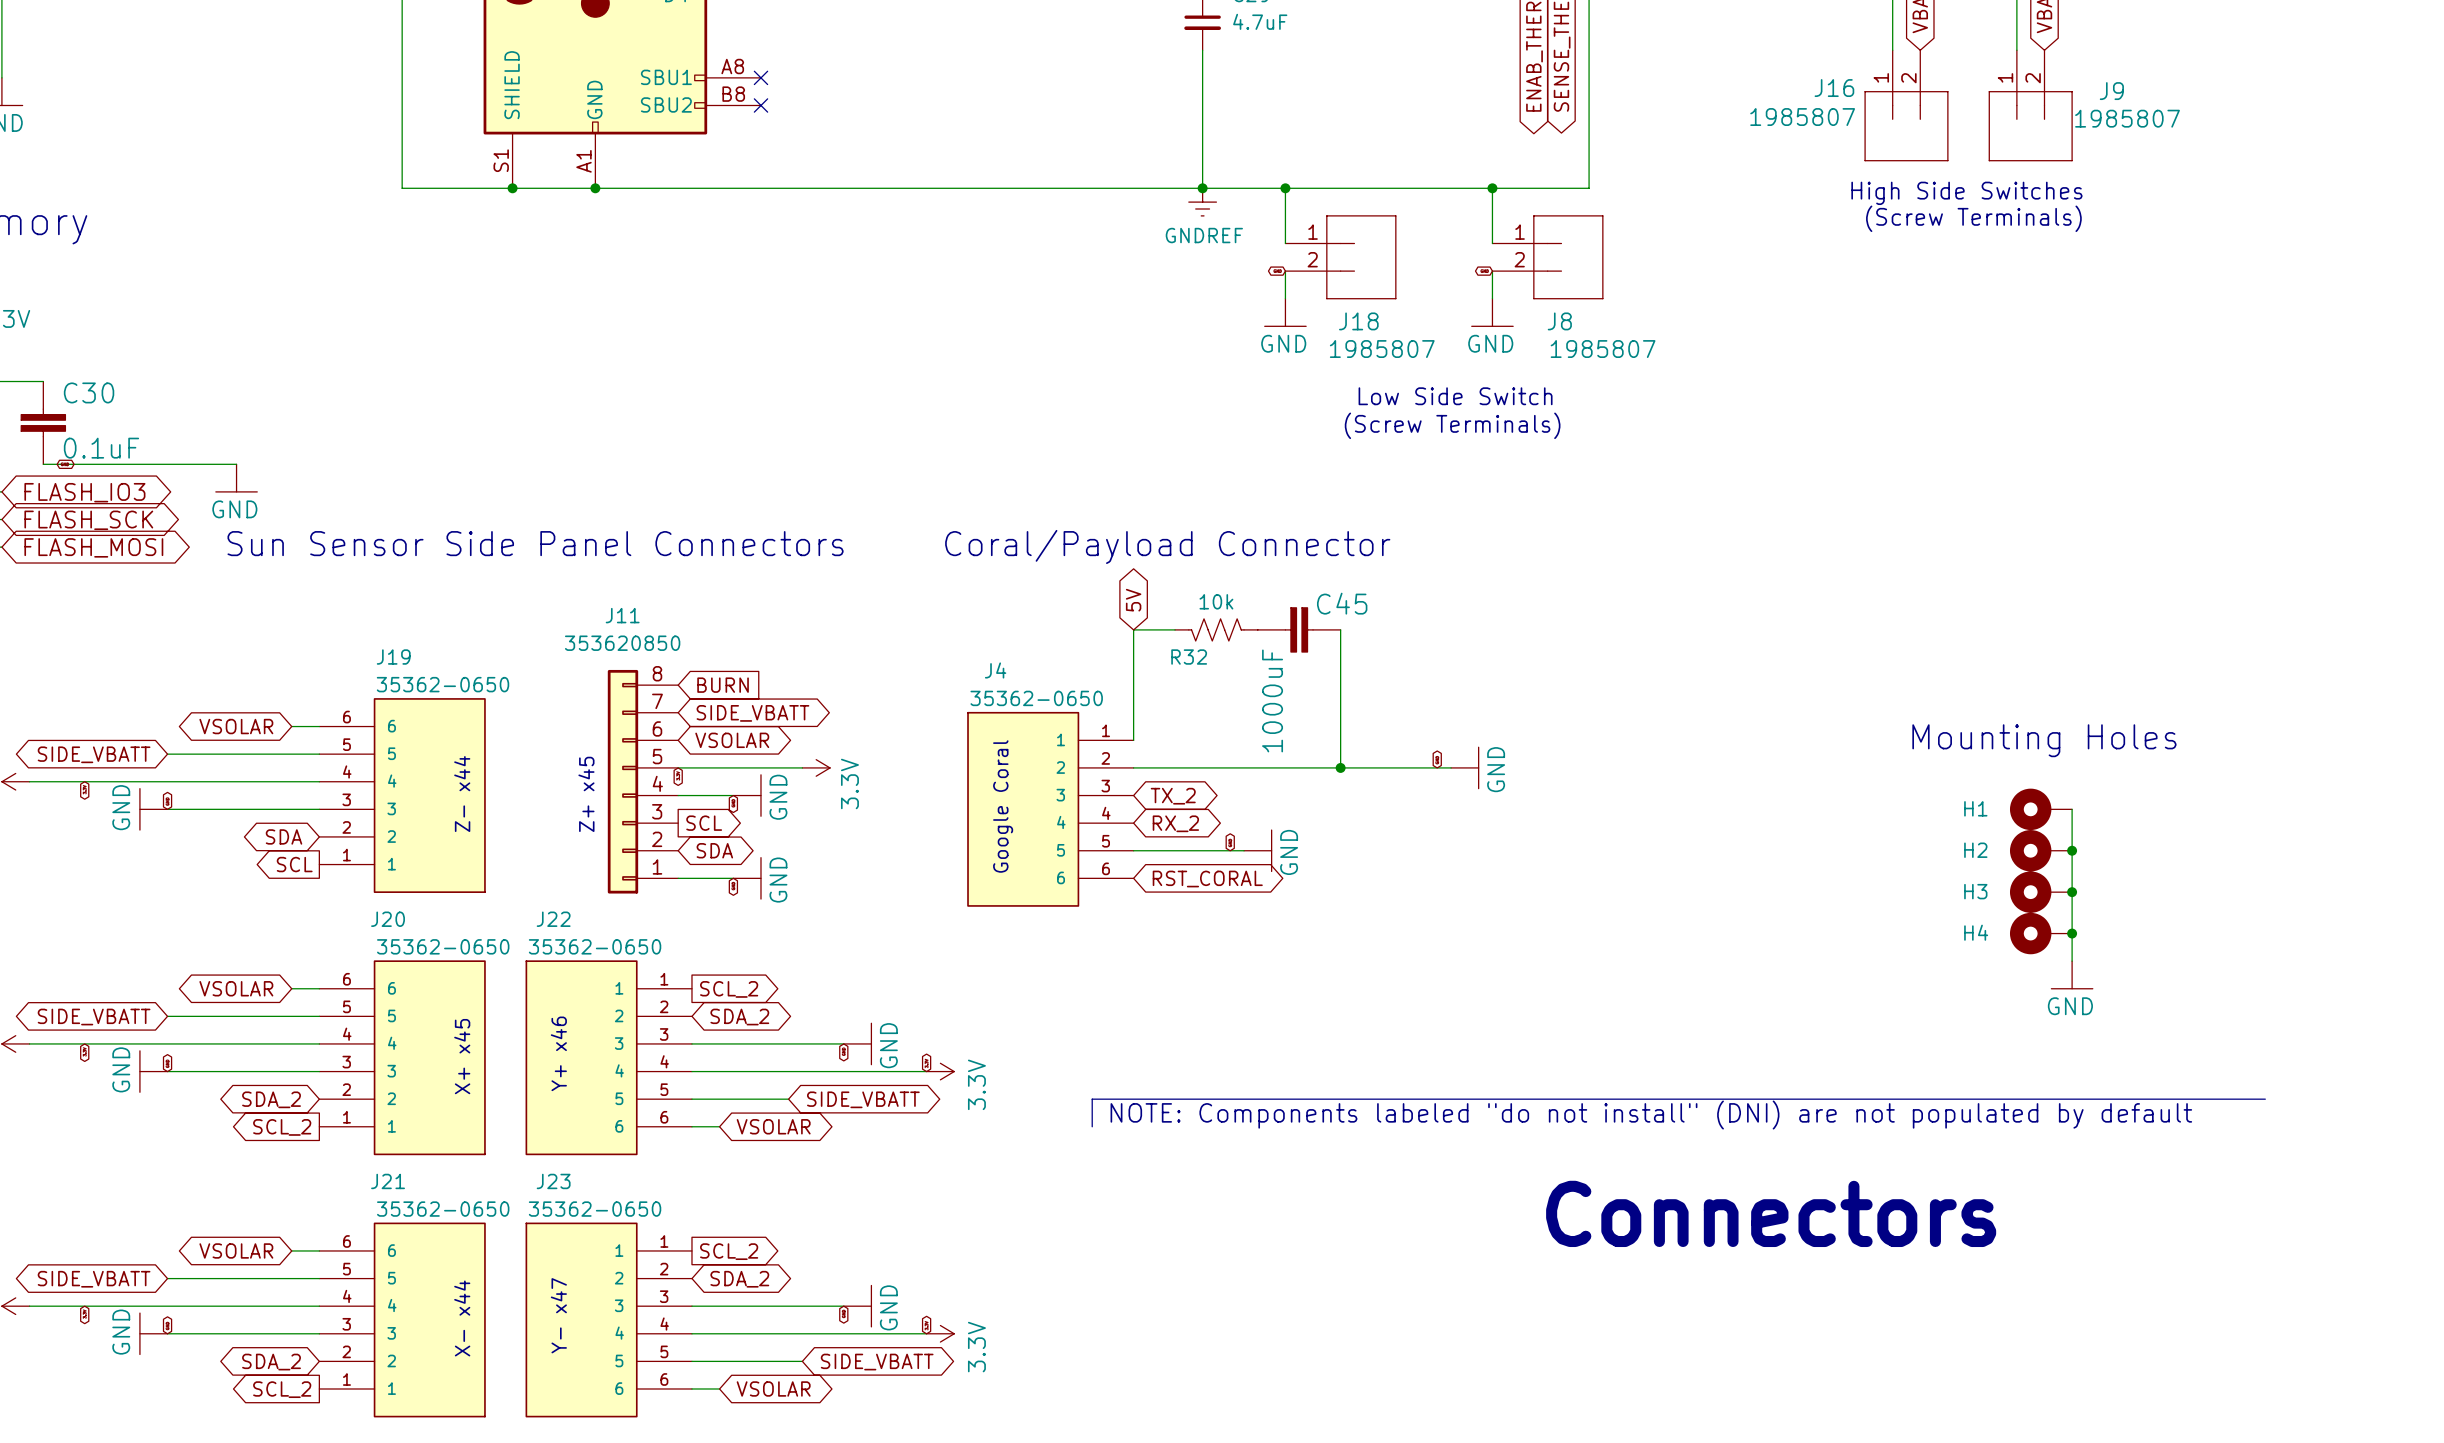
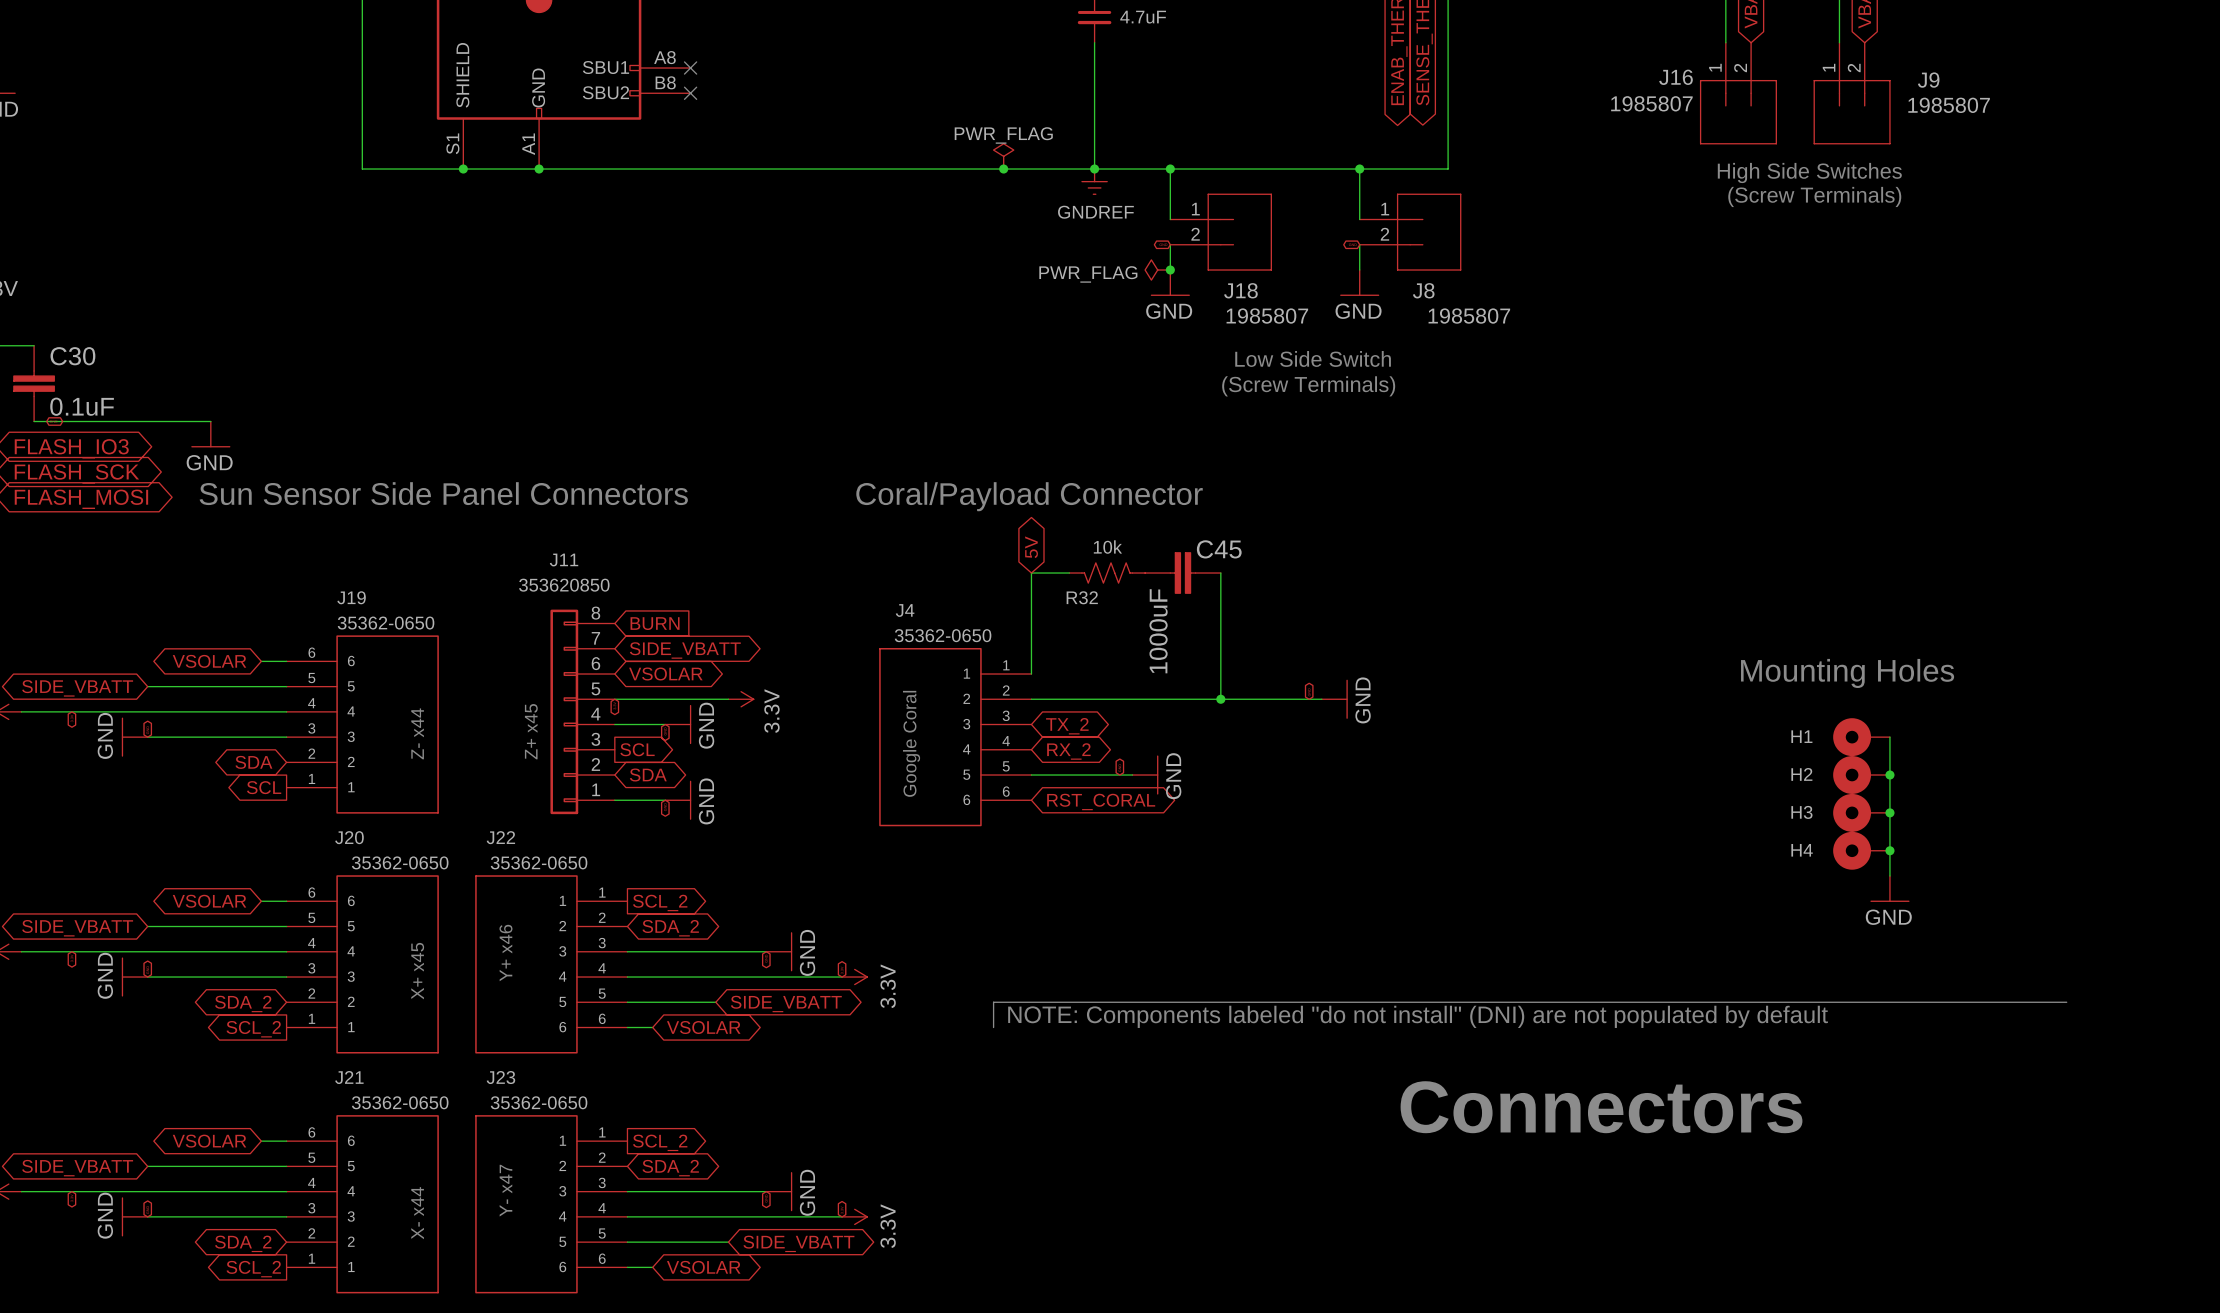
power symbol: none -> PWR_FLAG (1003, 156)
junction: none -> (1003, 169)
power symbol: none -> PWR_FLAG (1157, 270)
junction: none -> (1170, 270)

